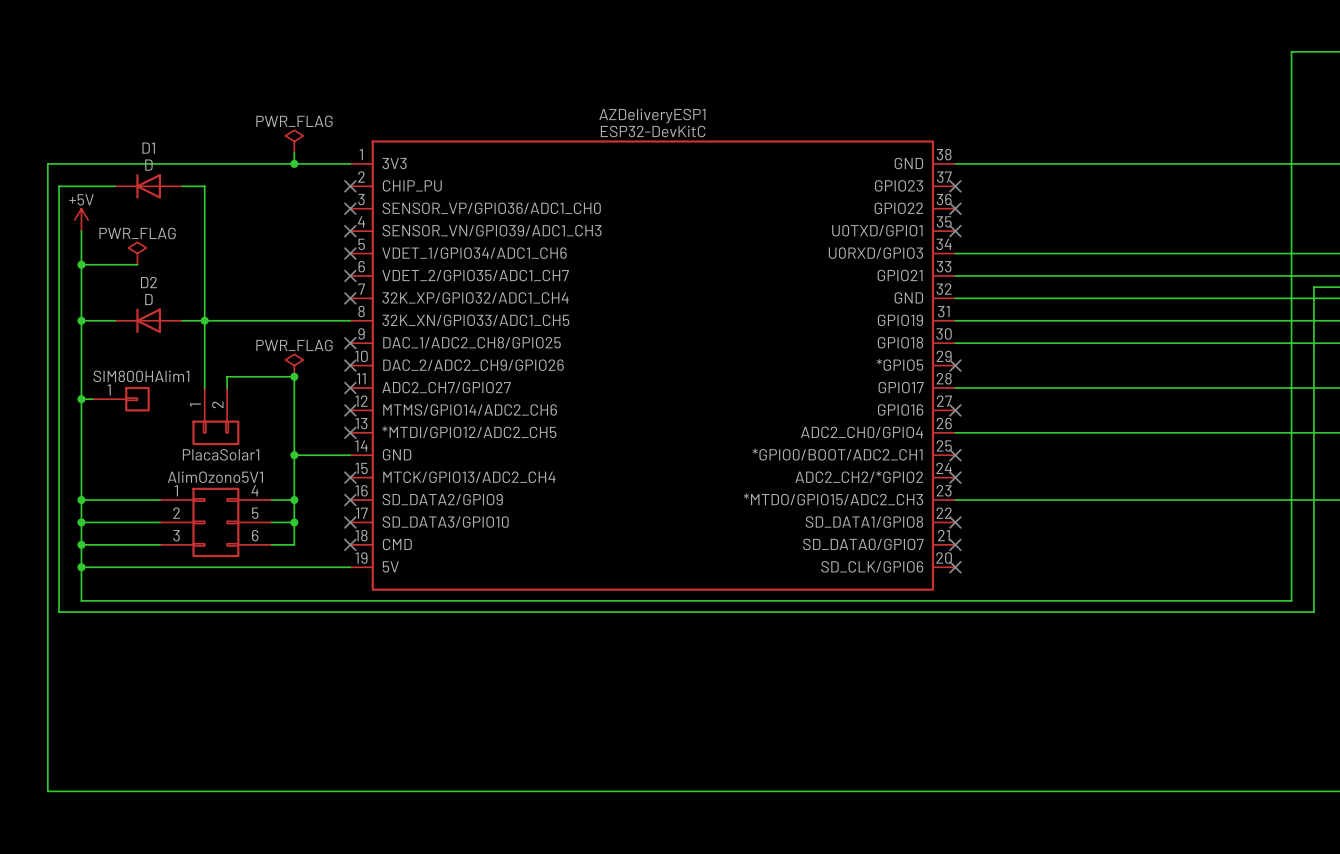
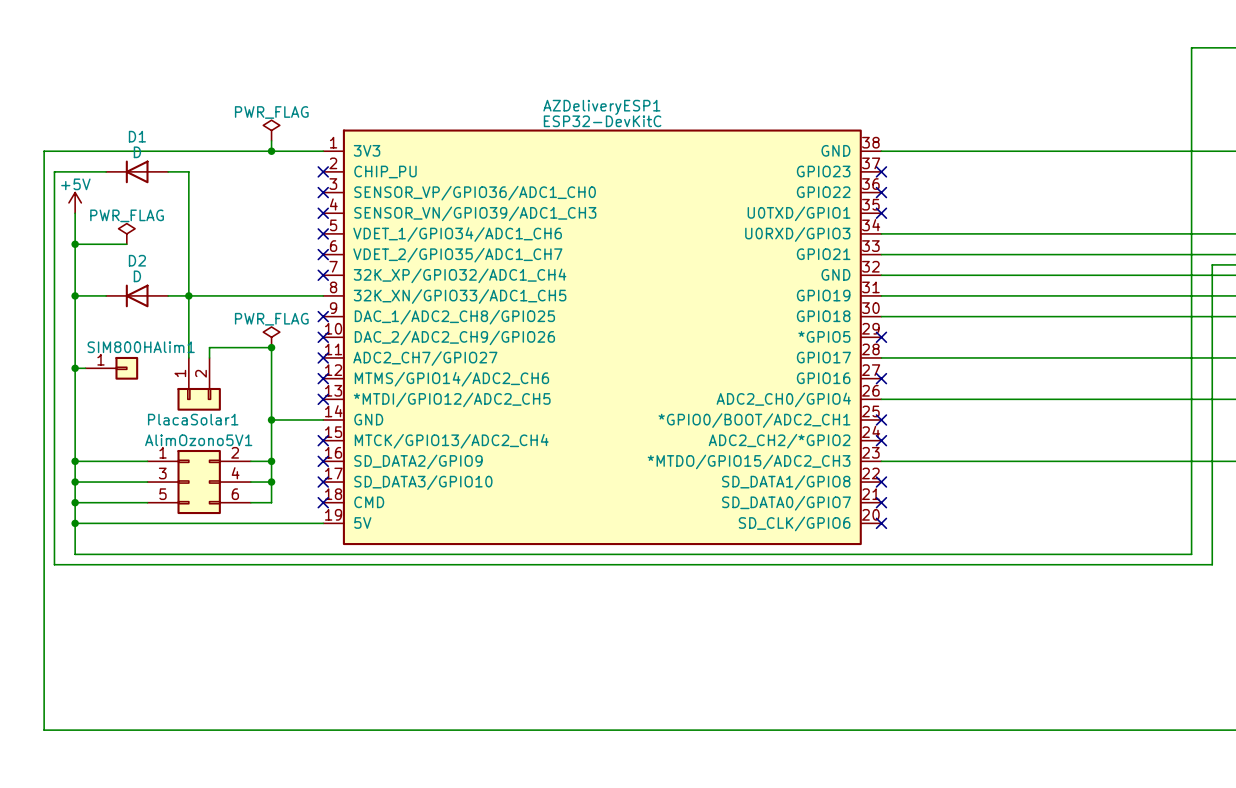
AlimOzono5V1 pin number: 4 (255, 490) -> 2 (235, 452)
AlimOzono5V1 pin number: 2 (176, 513) -> 3 (162, 473)
AlimOzono5V1 pin number: 5 (255, 513) -> 4 (235, 473)
AlimOzono5V1 pin number: 3 (176, 535) -> 5 (163, 494)

